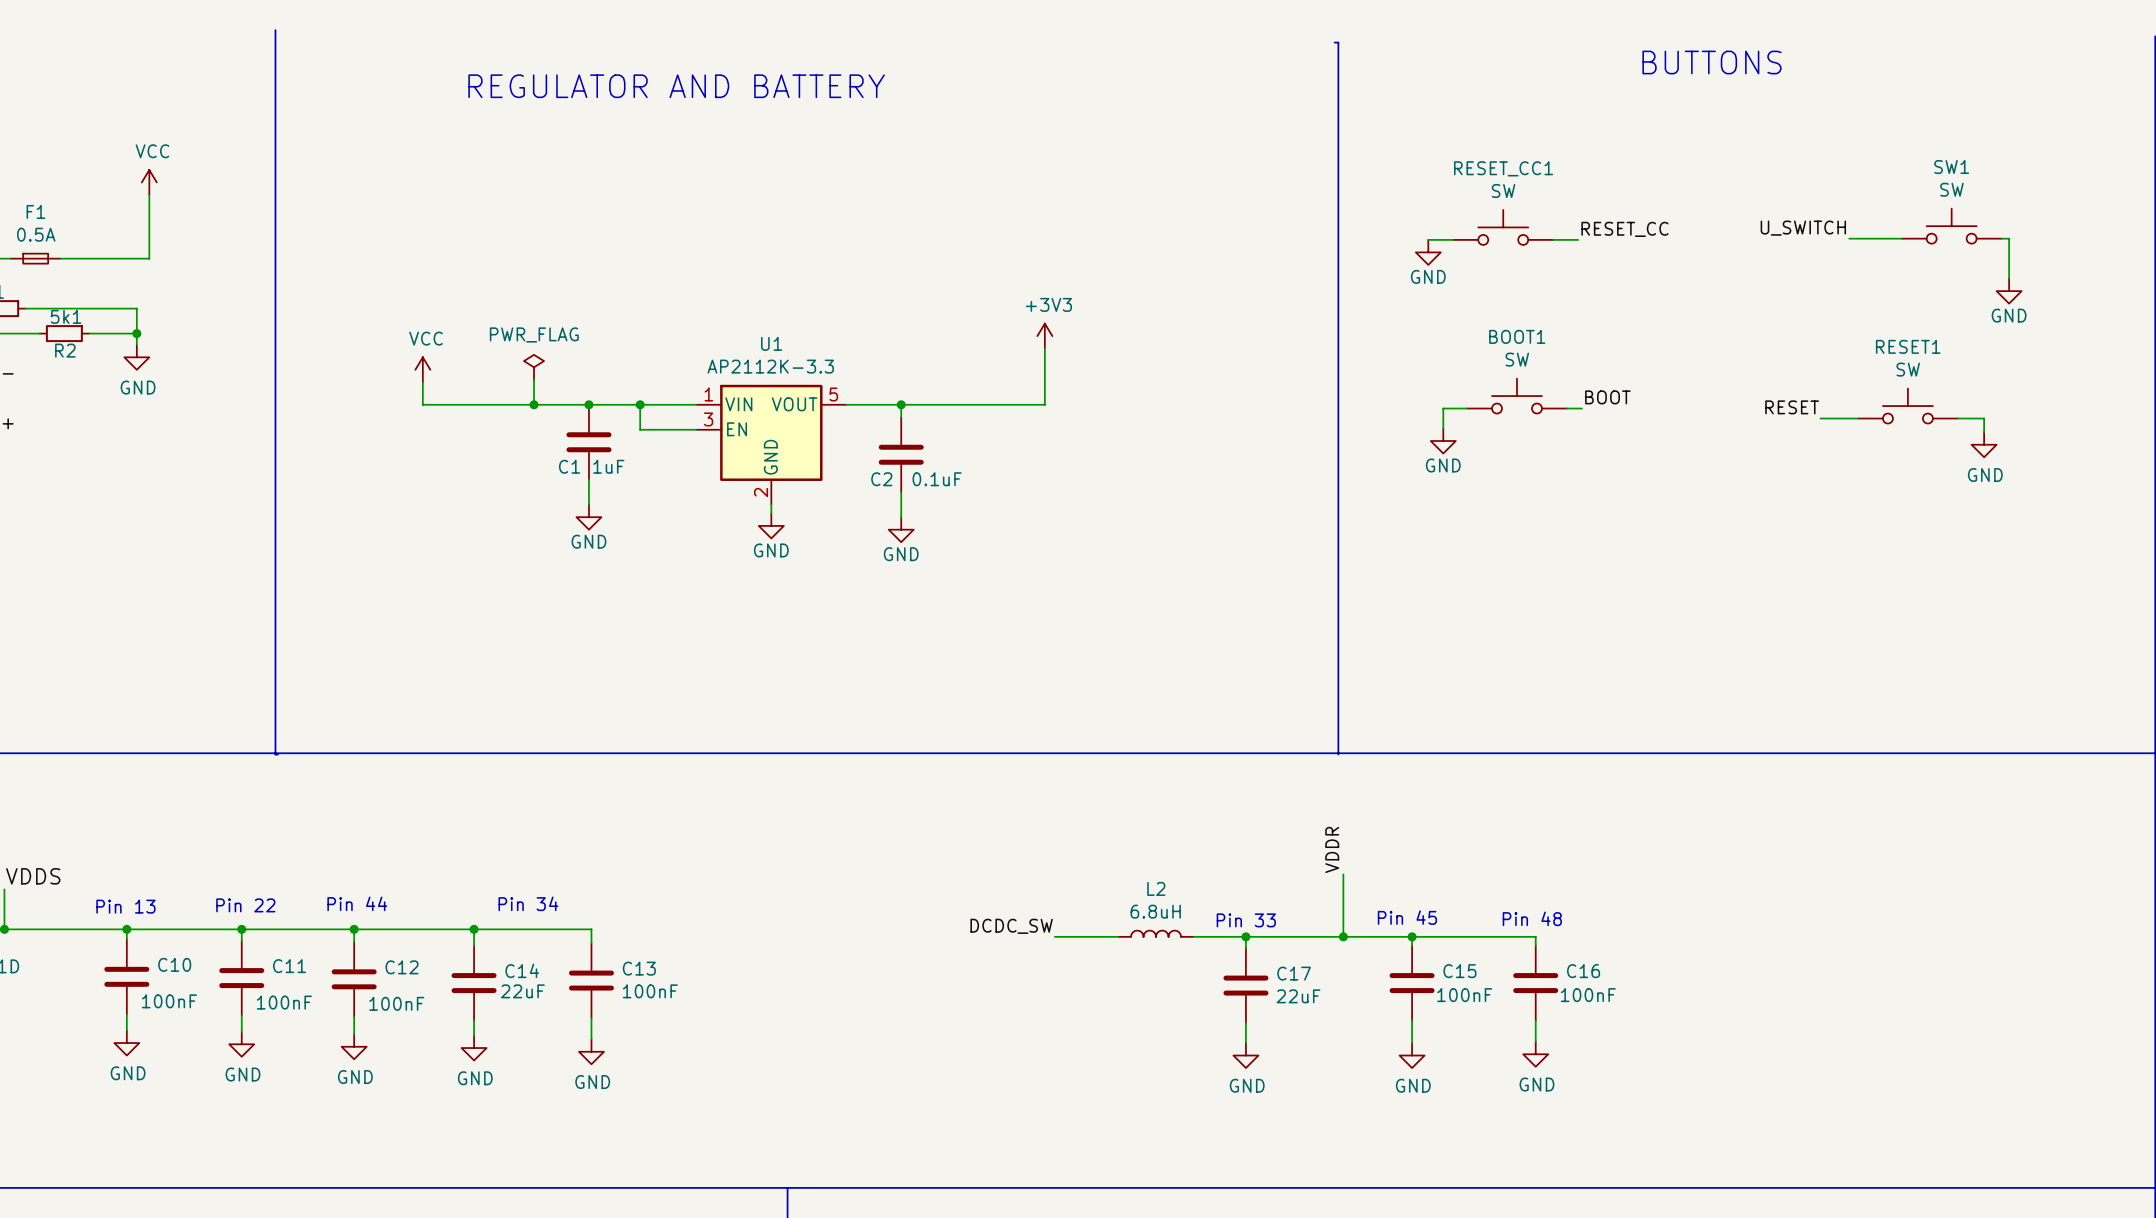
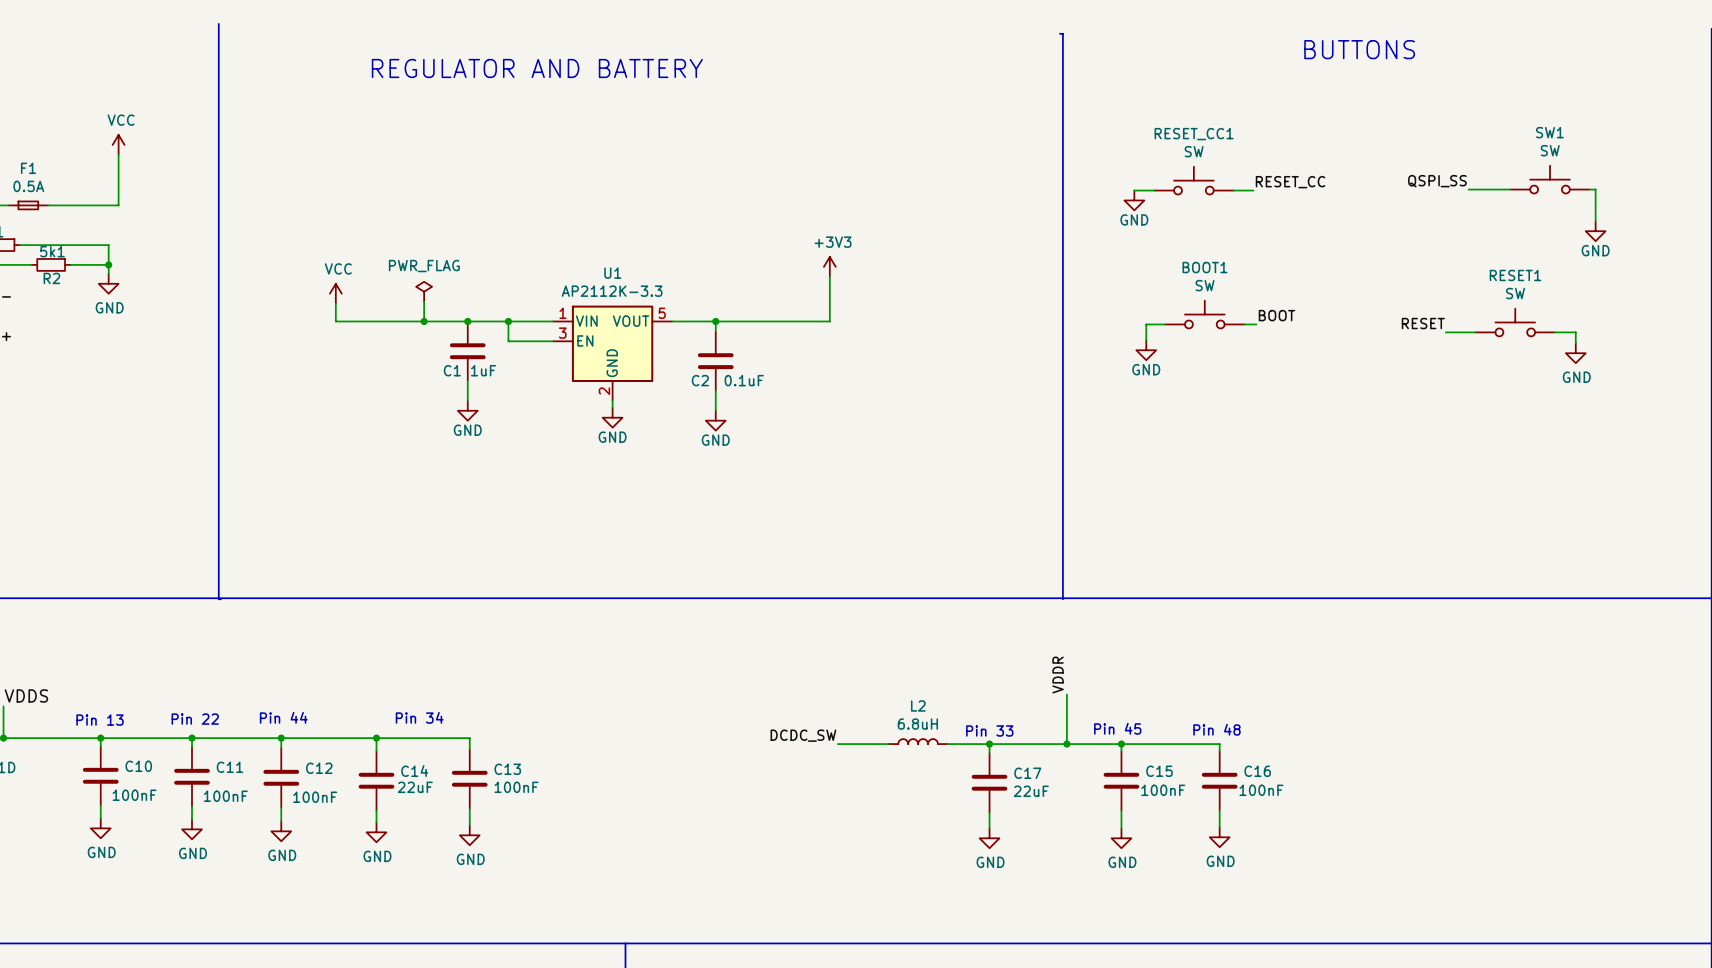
label: U_SWITCH (1803, 228) -> QSPI_SS (1437, 181)

